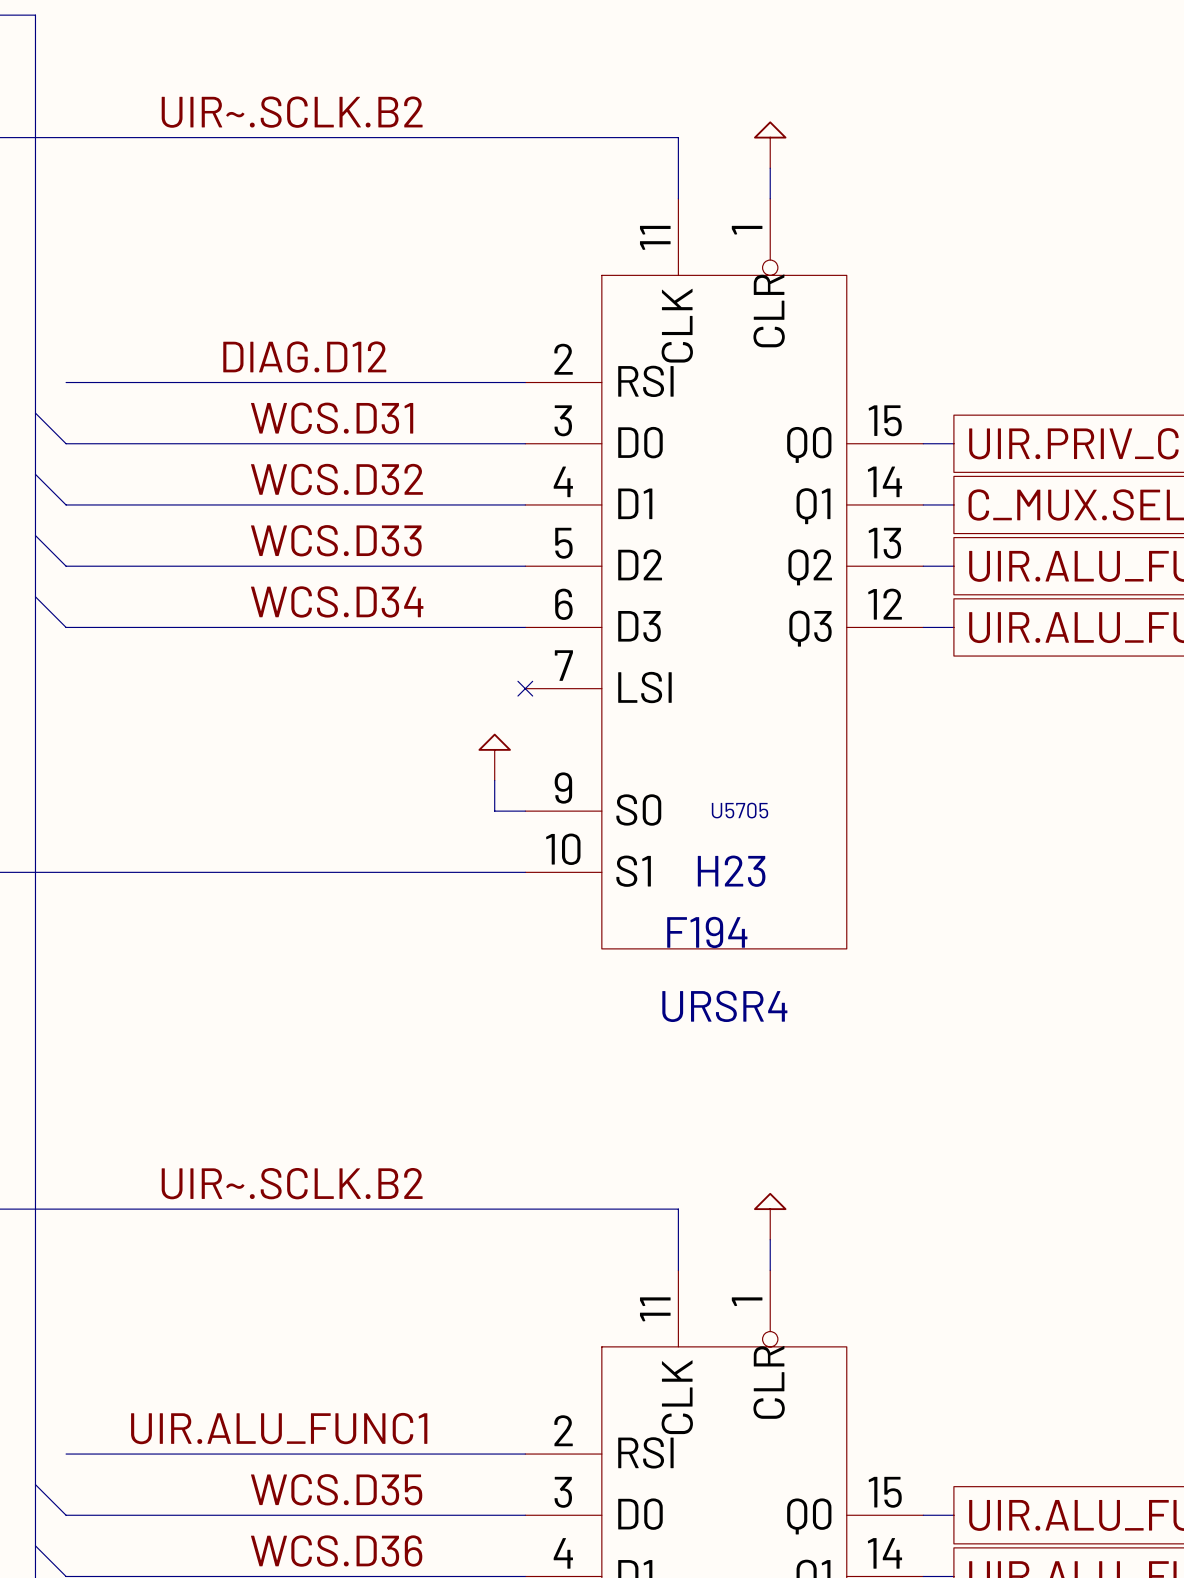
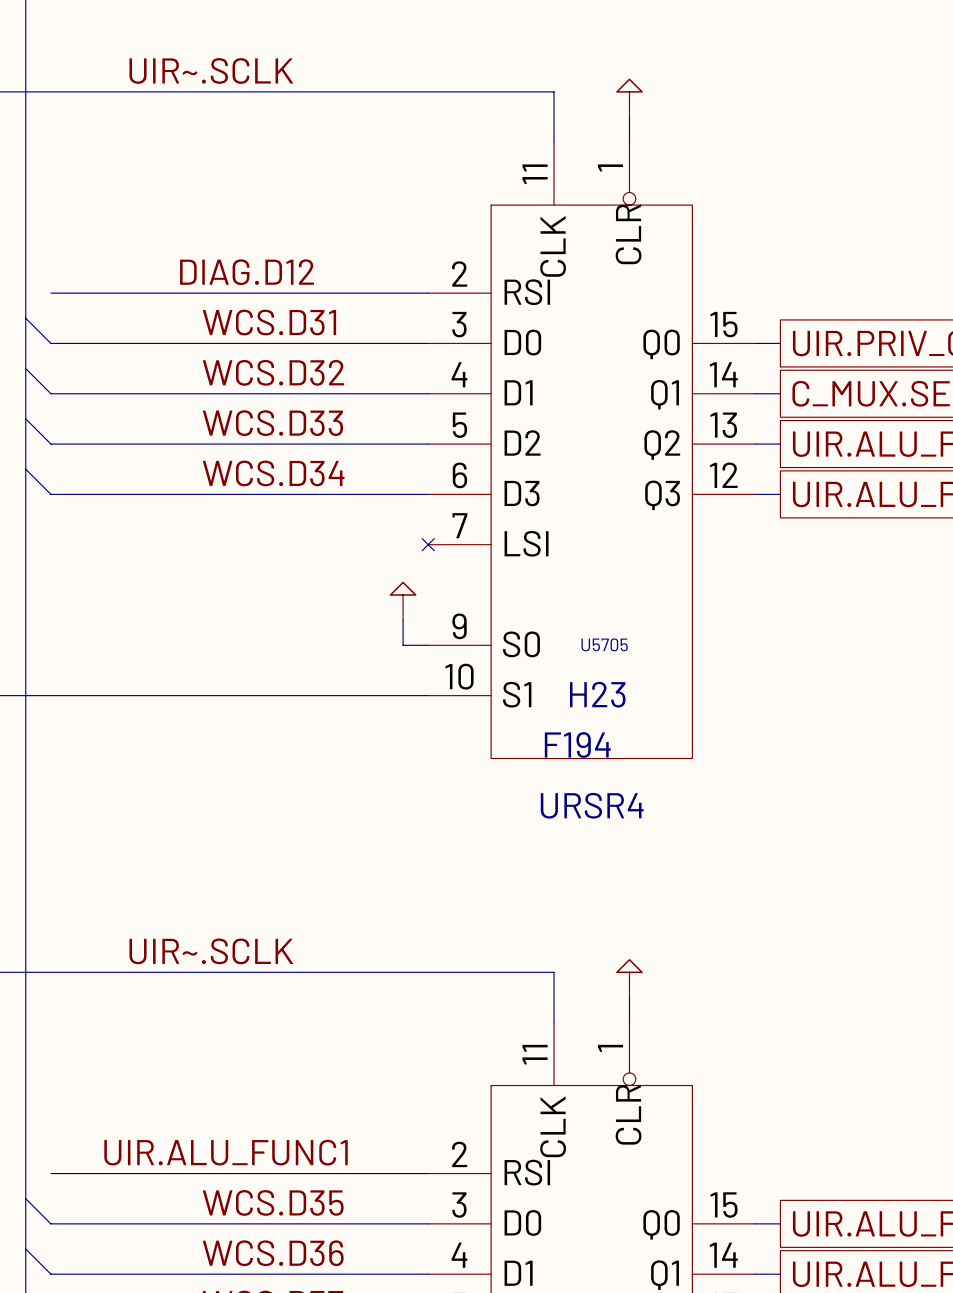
label: UIR~.SCLK.B2 (292, 112) -> UIR~.SCLK (211, 70)
label: UIR~.SCLK.B2 (292, 1183) -> UIR~.SCLK (211, 951)

